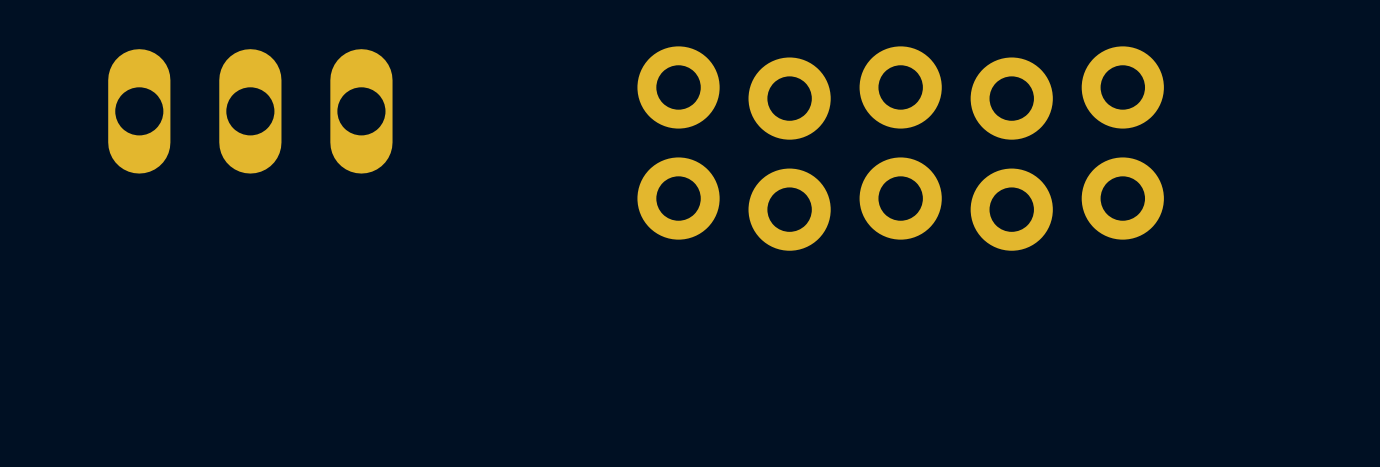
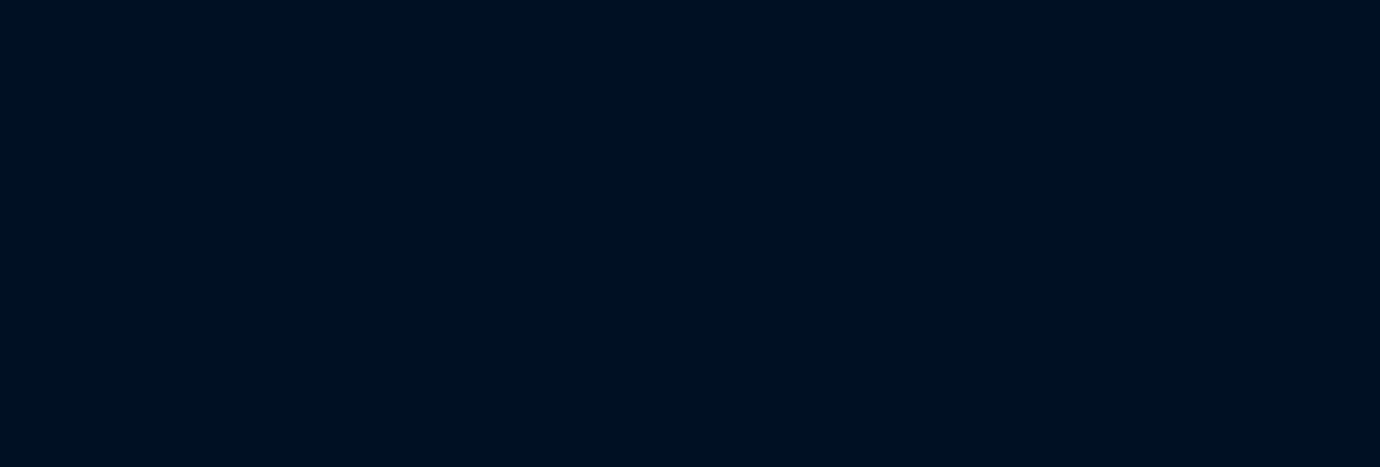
part: (250, 111) -> none
part: (900, 148) -> none

